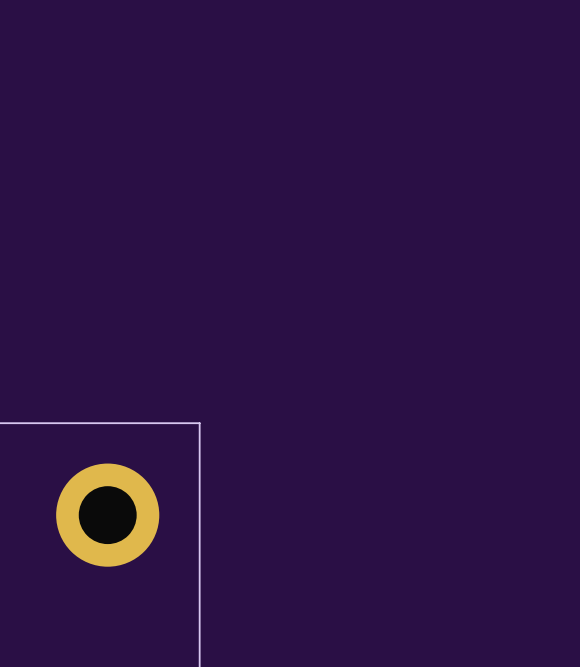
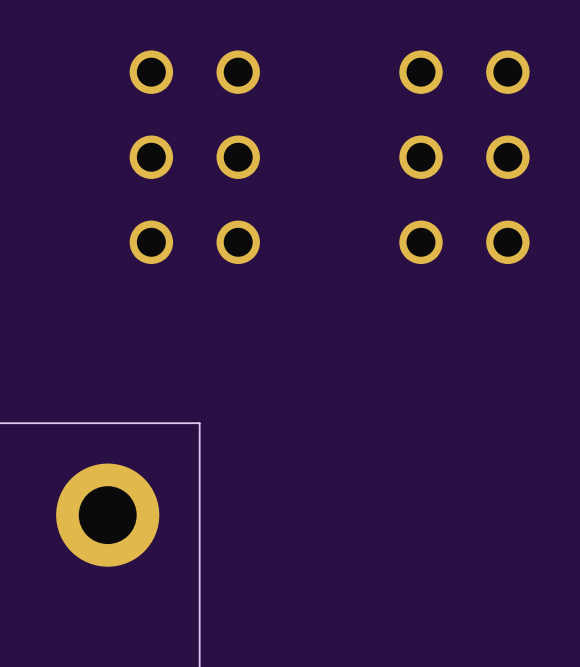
part: none -> (194, 157)
part: none -> (464, 157)

